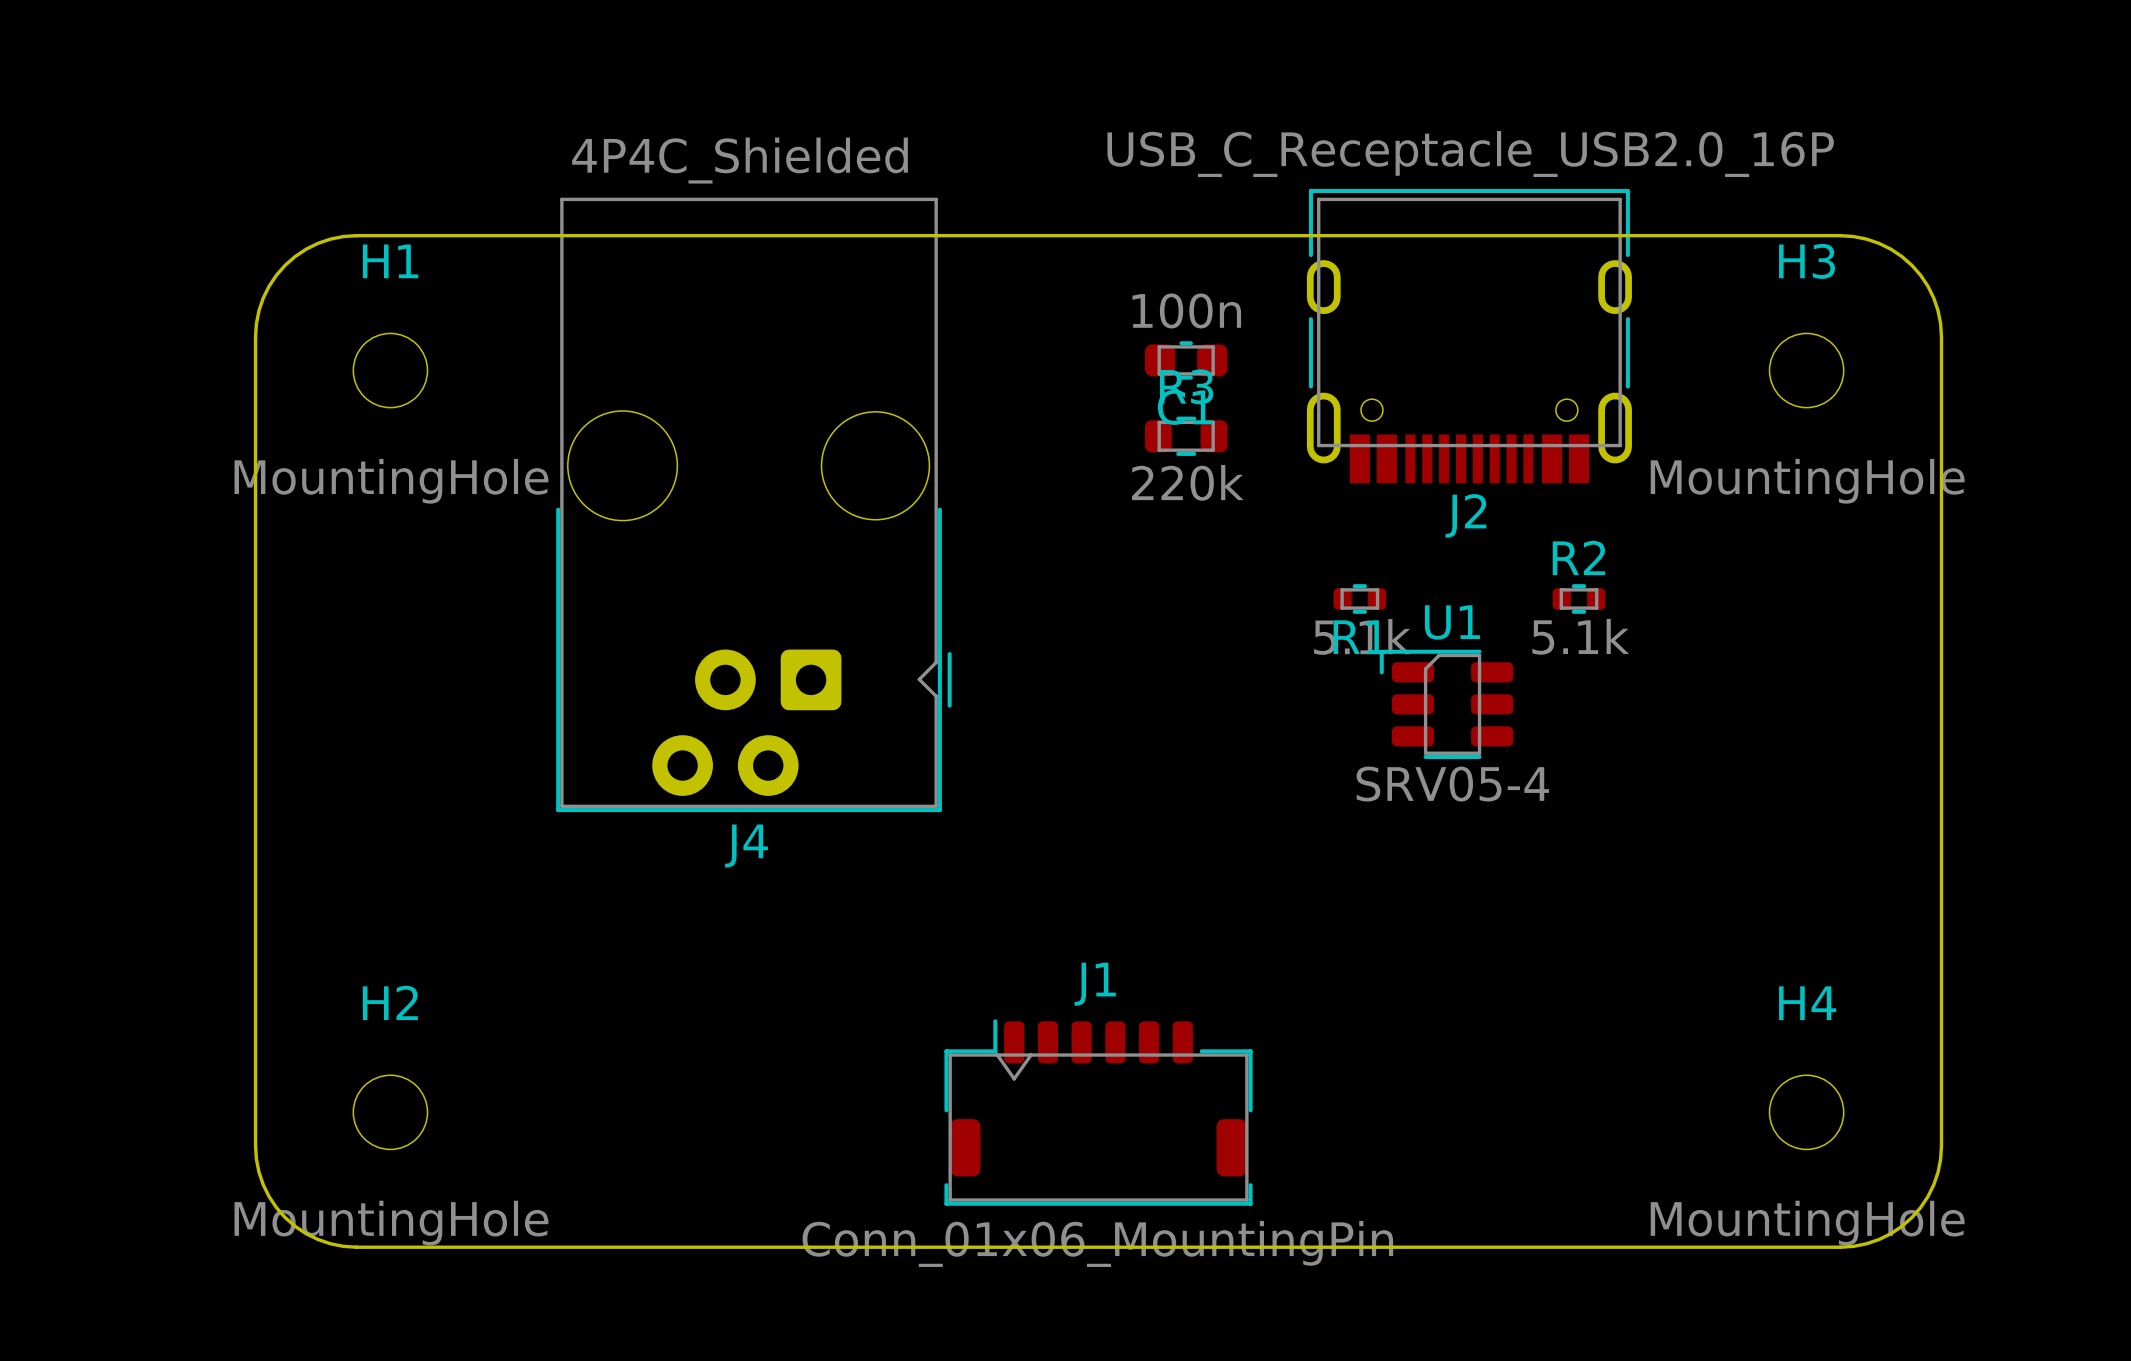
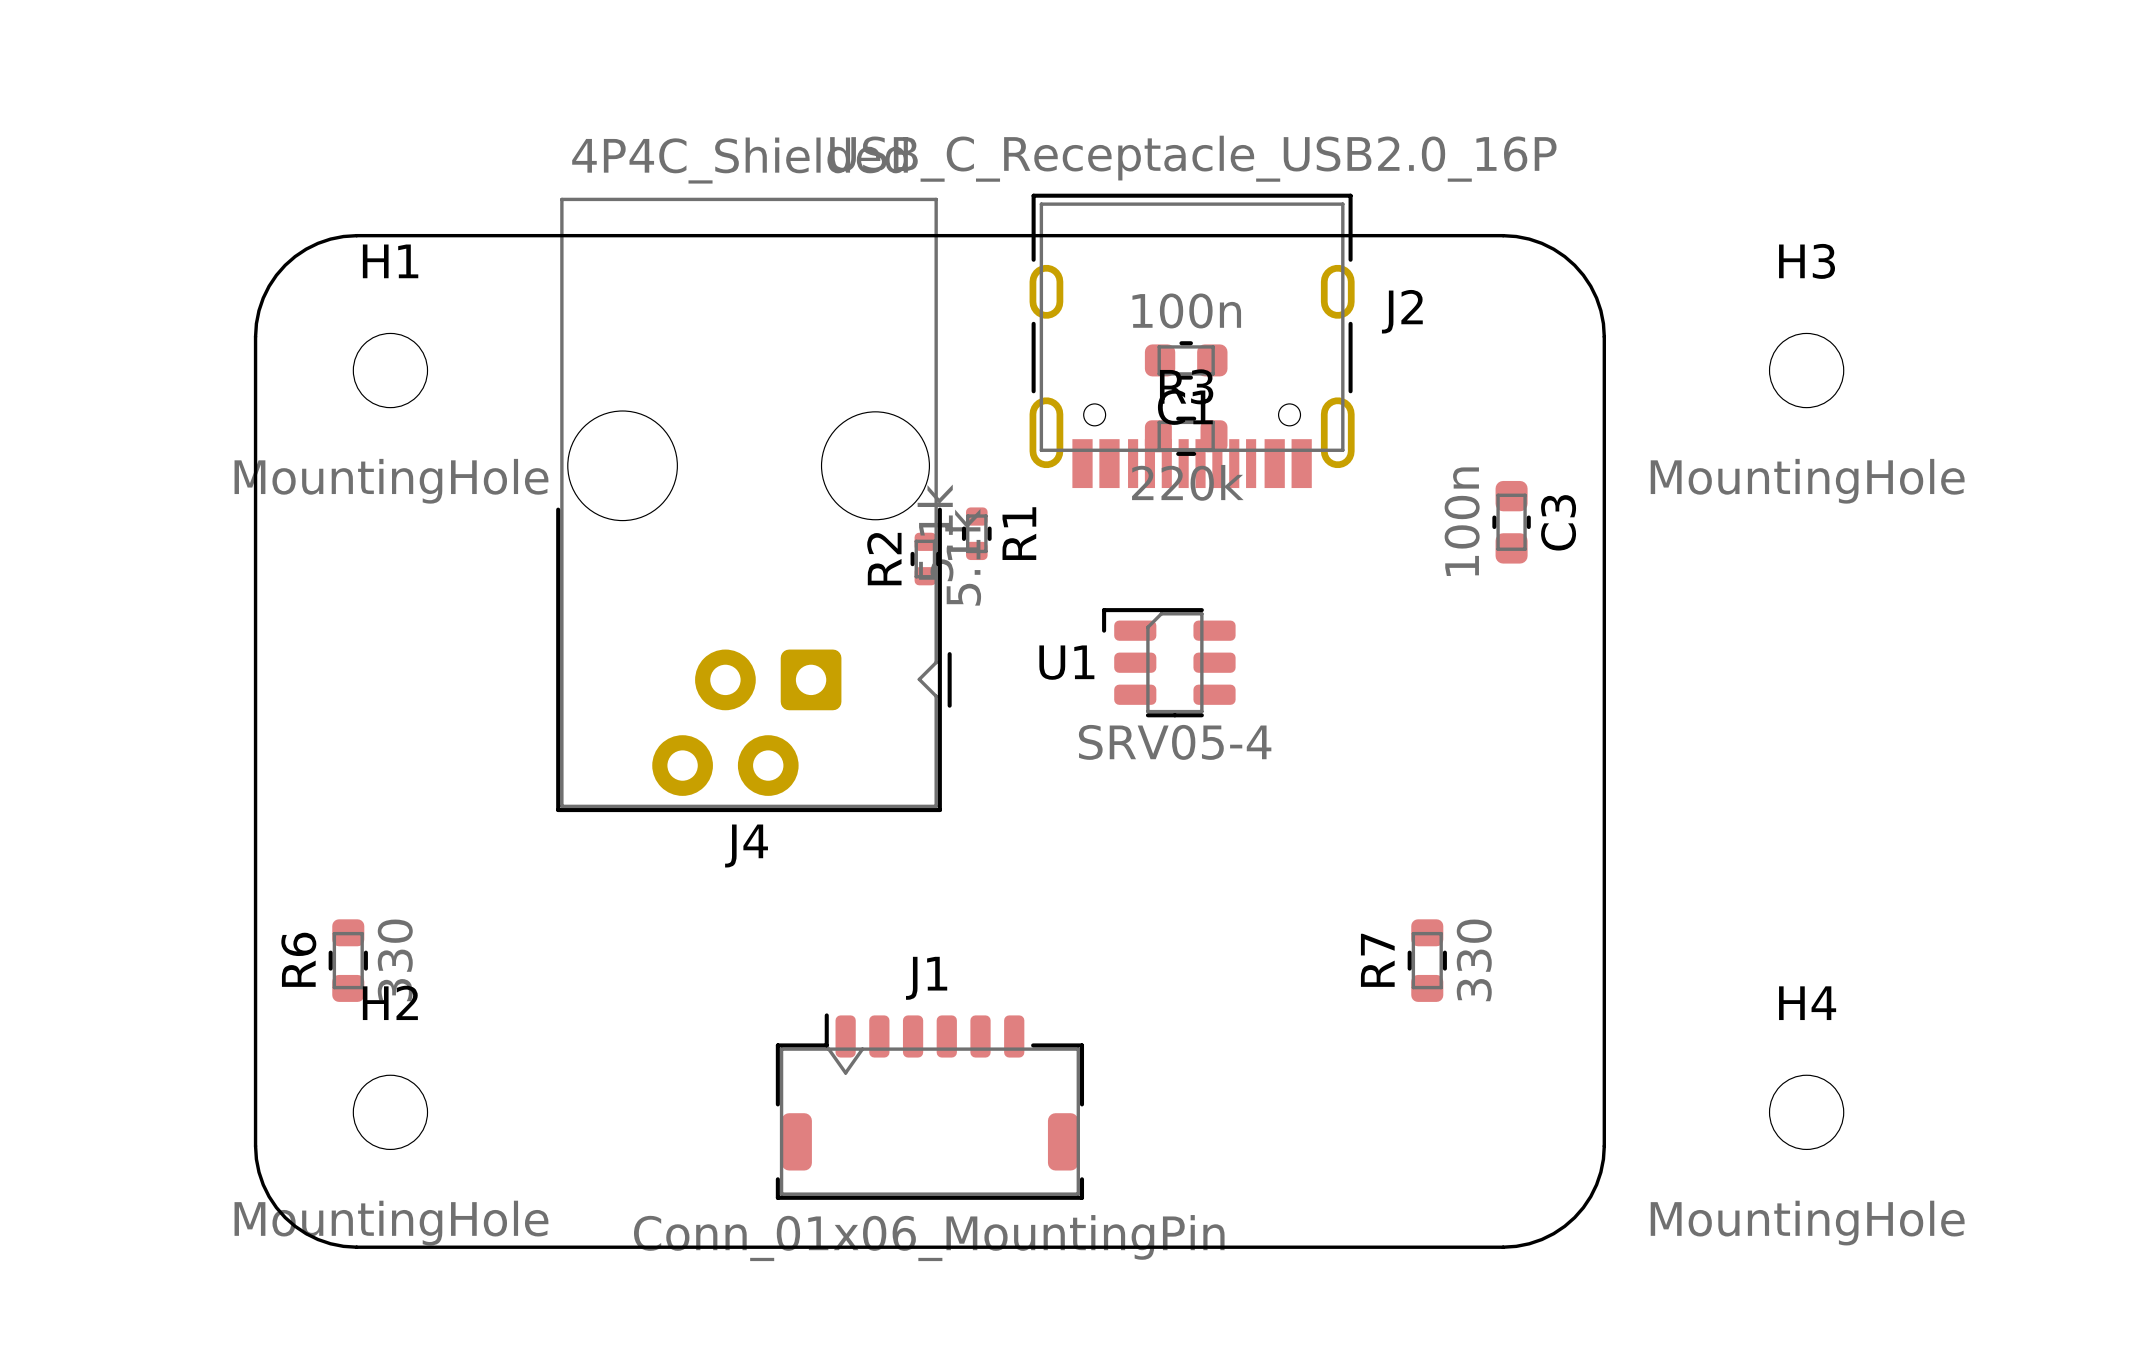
board edge: (1503, 235) (1840, 235) (1866, 239) (1879, 243) (1901, 256) (1920, 275) (1933, 298) (1938, 310) (1941, 336) (1941, 1146) (1940, 1159) (1933, 1184) (1920, 1207) (1901, 1226) (1879, 1239) (1853, 1246) (1503, 1247) -> (1503, 235) (1516, 236) (1541, 243) (1564, 256) (1574, 265) (1583, 275) (1596, 298) (1600, 310) (1604, 336) (1603, 1159) (1600, 1172) (1590, 1196) (1574, 1217) (1564, 1226) (1553, 1233) (1529, 1243) (1503, 1247)
J2 position: (1469, 336) -> (1192, 340)
J2 name position: J2 (1465, 515) -> J2 (1402, 311)
C3: none -> 100n (1511, 522)
R1 rotation: 0° (1359, 598) -> 90° clockwise (976, 533)
R1 position: (1359, 598) -> (976, 533)
R2 rotation: 0° (1579, 598) -> 90° clockwise (925, 559)
R2 position: (1579, 598) -> (925, 559)
U1 name position: U1 (1452, 622) -> U1 (1066, 662)
U1 position: (1446, 704) -> (1168, 662)
R6: none -> 330 (348, 960)
R7: none -> 330 (1427, 960)
J1 position: (1098, 1112) -> (929, 1106)

